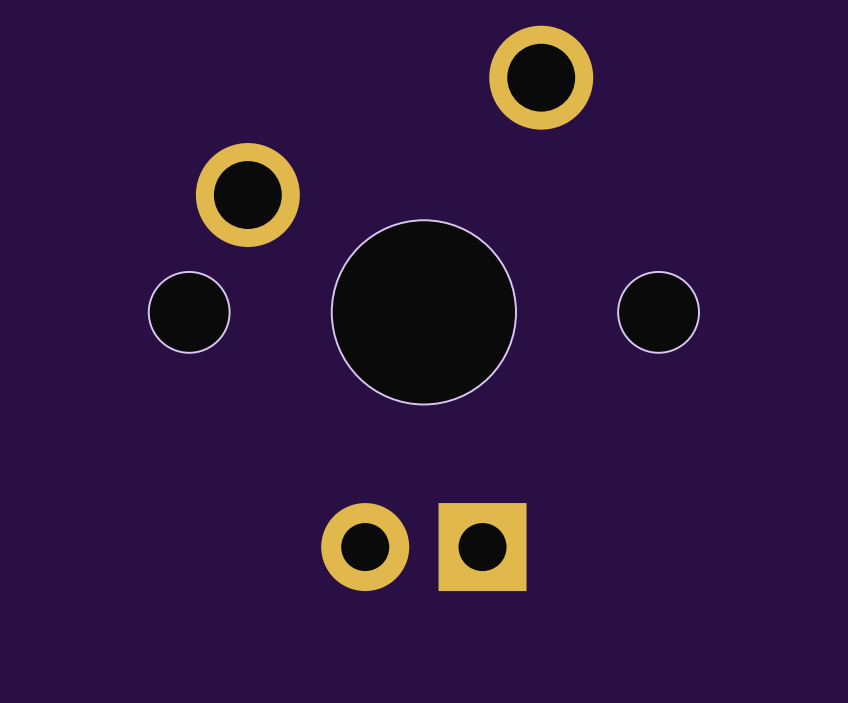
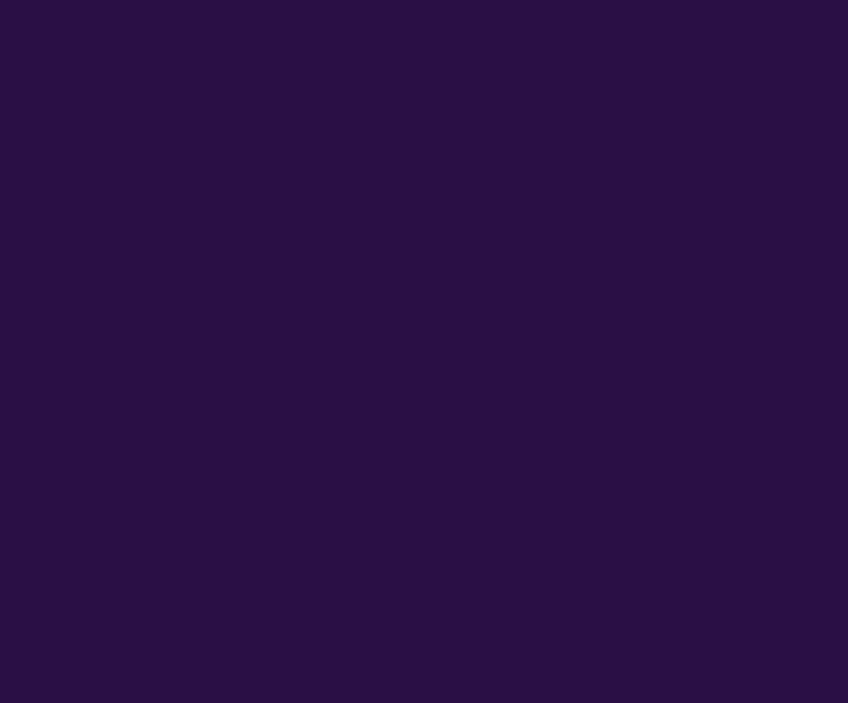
part: (423, 308) -> none

